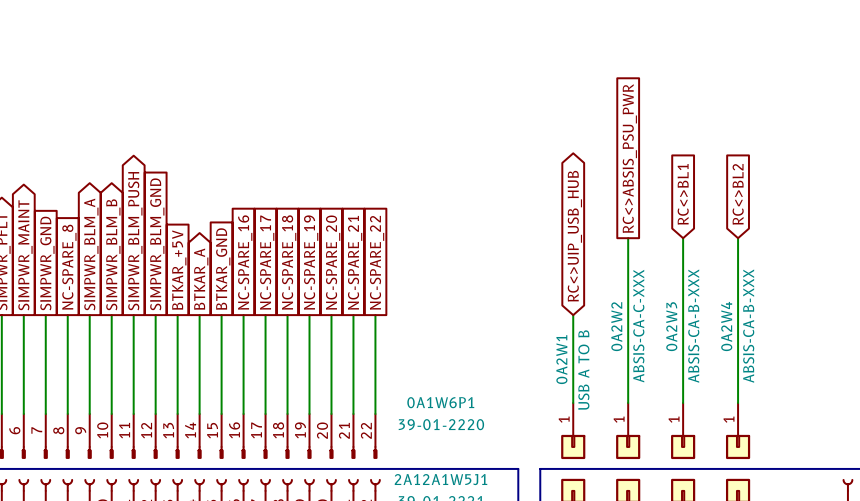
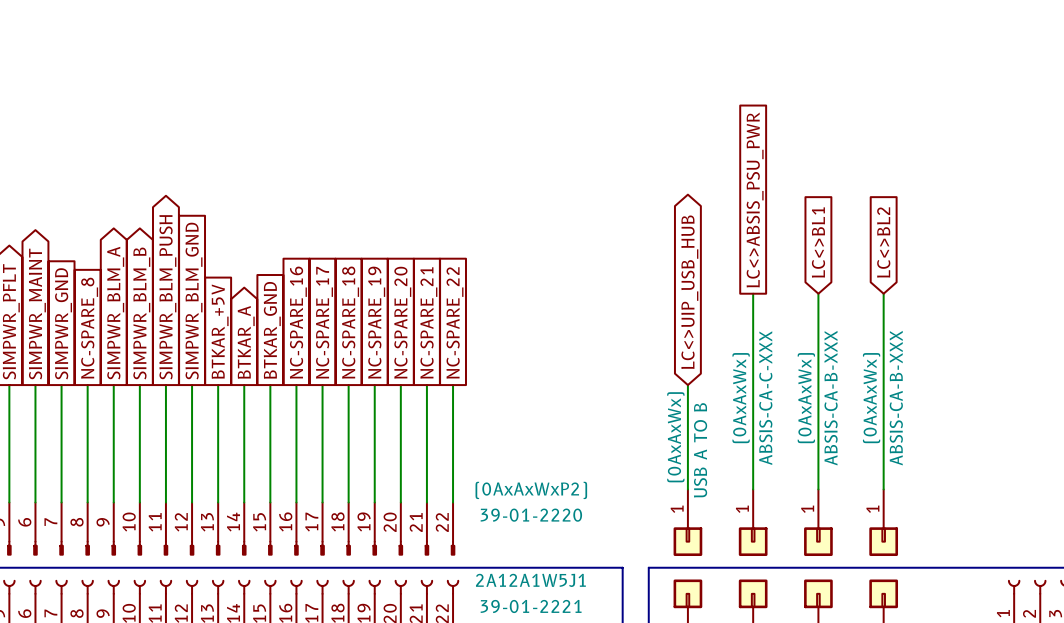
global label: RC<>ABSIS_PSU_PWR (629, 158) -> LC<>ABSIS_PSU_PWR (755, 200)
global label: RC<>BL1 (683, 194) -> LC<>BL1 (818, 242)
global label: RC<>BL2 (738, 194) -> LC<>BL2 (883, 242)
global label: RC<>UIP_USB_HUB (574, 236) -> LC<>UIP_USB_HUB (689, 292)
0A2W2 name: 0A2W2 (616, 326) -> (0AxAxWx) (741, 398)
0A2W3 name: 0A2W3 (671, 326) -> (0AxAxWx) (806, 398)
0A2W4 name: 0A2W4 (726, 326) -> (0AxAxWx) (871, 398)
0A2W1 name: 0A2W1 (561, 359) -> (0AxAxWx) (675, 437)
0A1W6P1 name: 0A1W6P1 (440, 402) -> (0AxAxWxP2) (531, 490)

